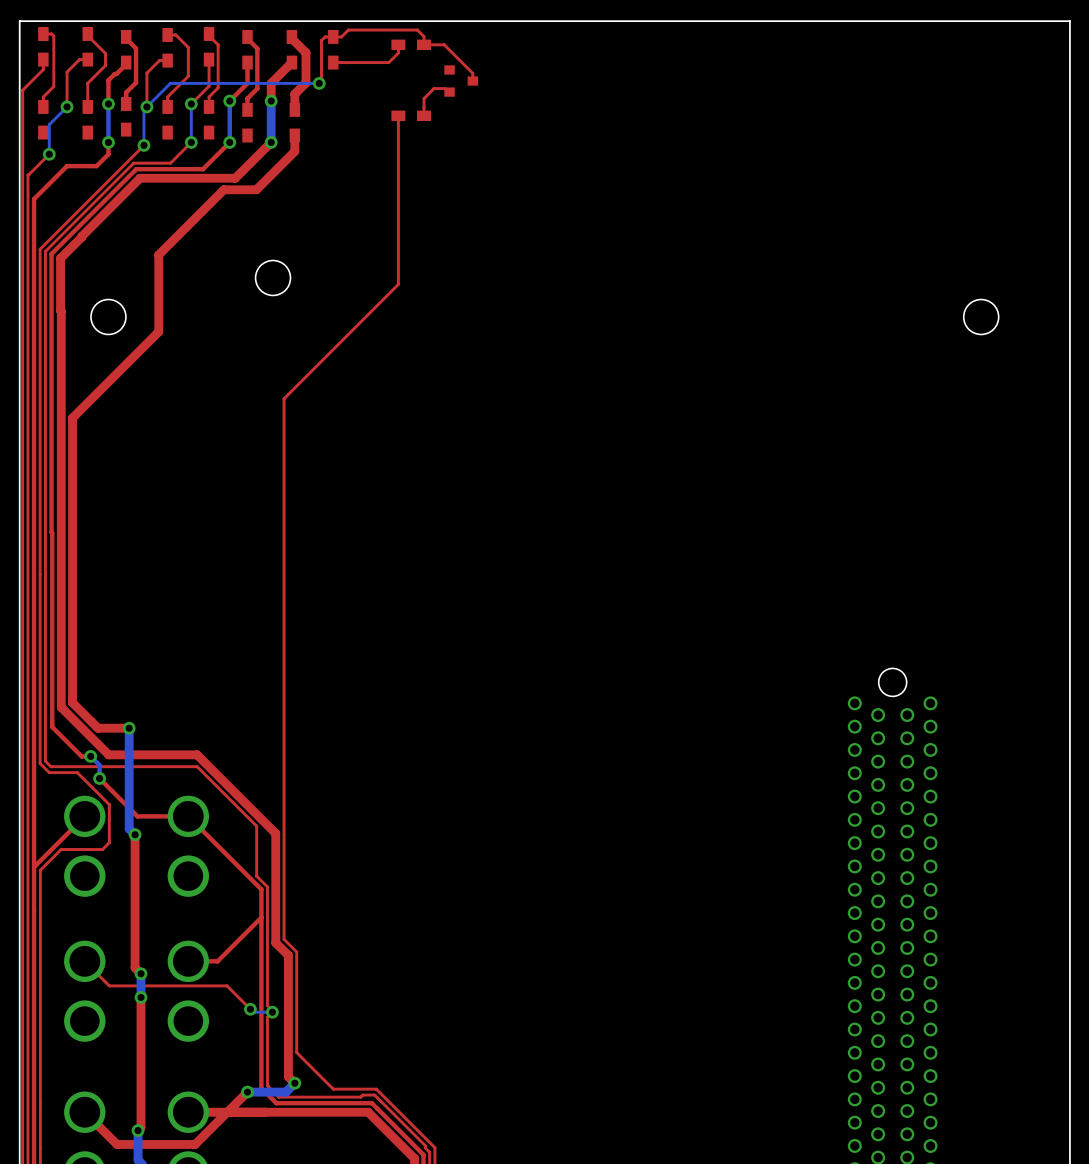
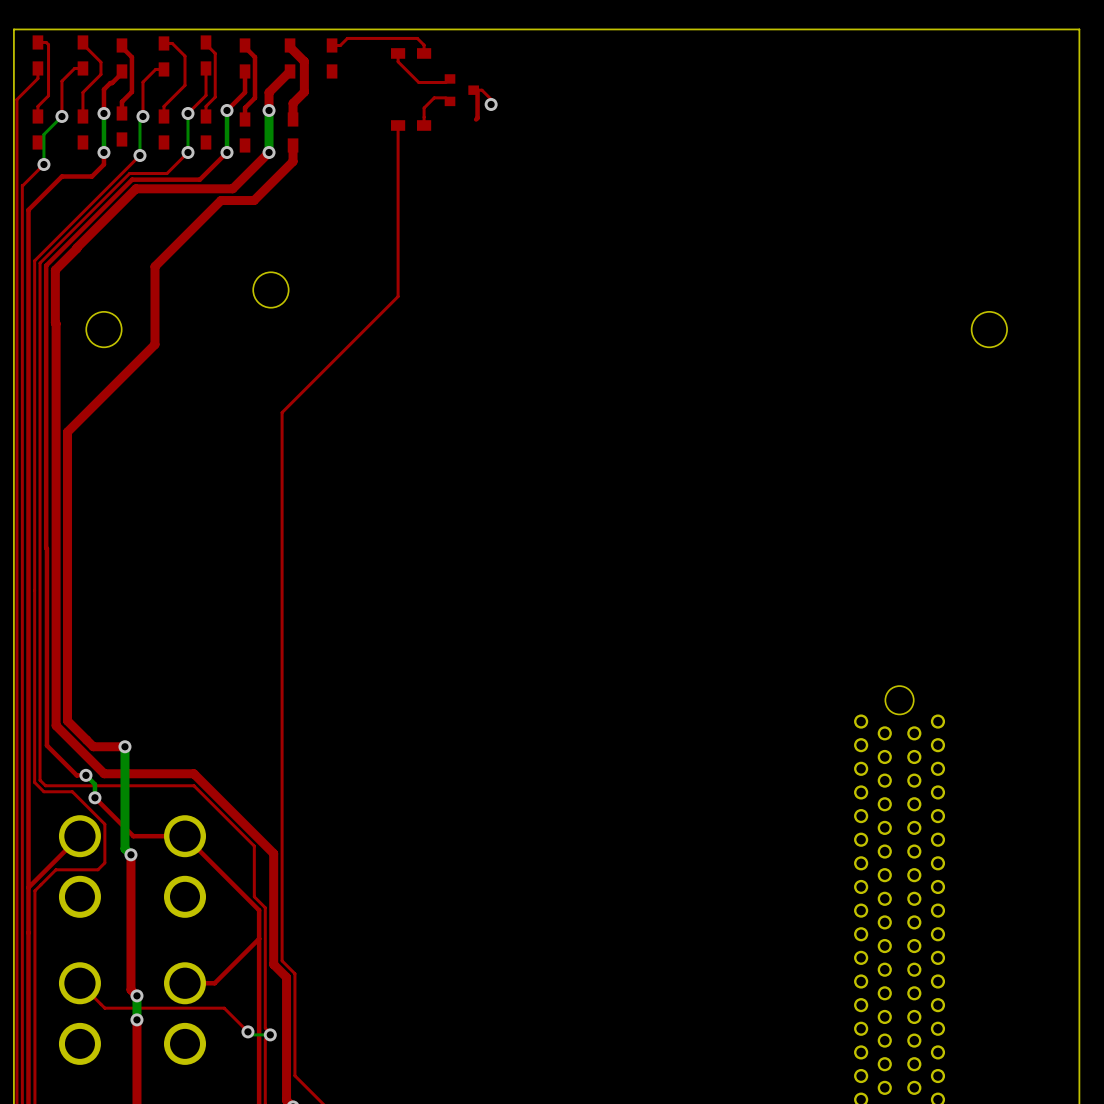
top track: (333, 36) (325, 36) (321, 40) (321, 81) (319, 83) -> none
top track: (424, 44) (444, 44) (472, 73) (472, 81) -> (491, 104) (491, 99) (481, 90) (473, 90)
top track: (398, 53) (388, 62) (333, 62) -> (398, 61) (418, 82) (446, 82)
top track: none -> (477, 90) (476, 119)
bottom track: (319, 83) (170, 83) (146, 106) -> none
via: (319, 83) -> none
via: none -> (491, 104)

